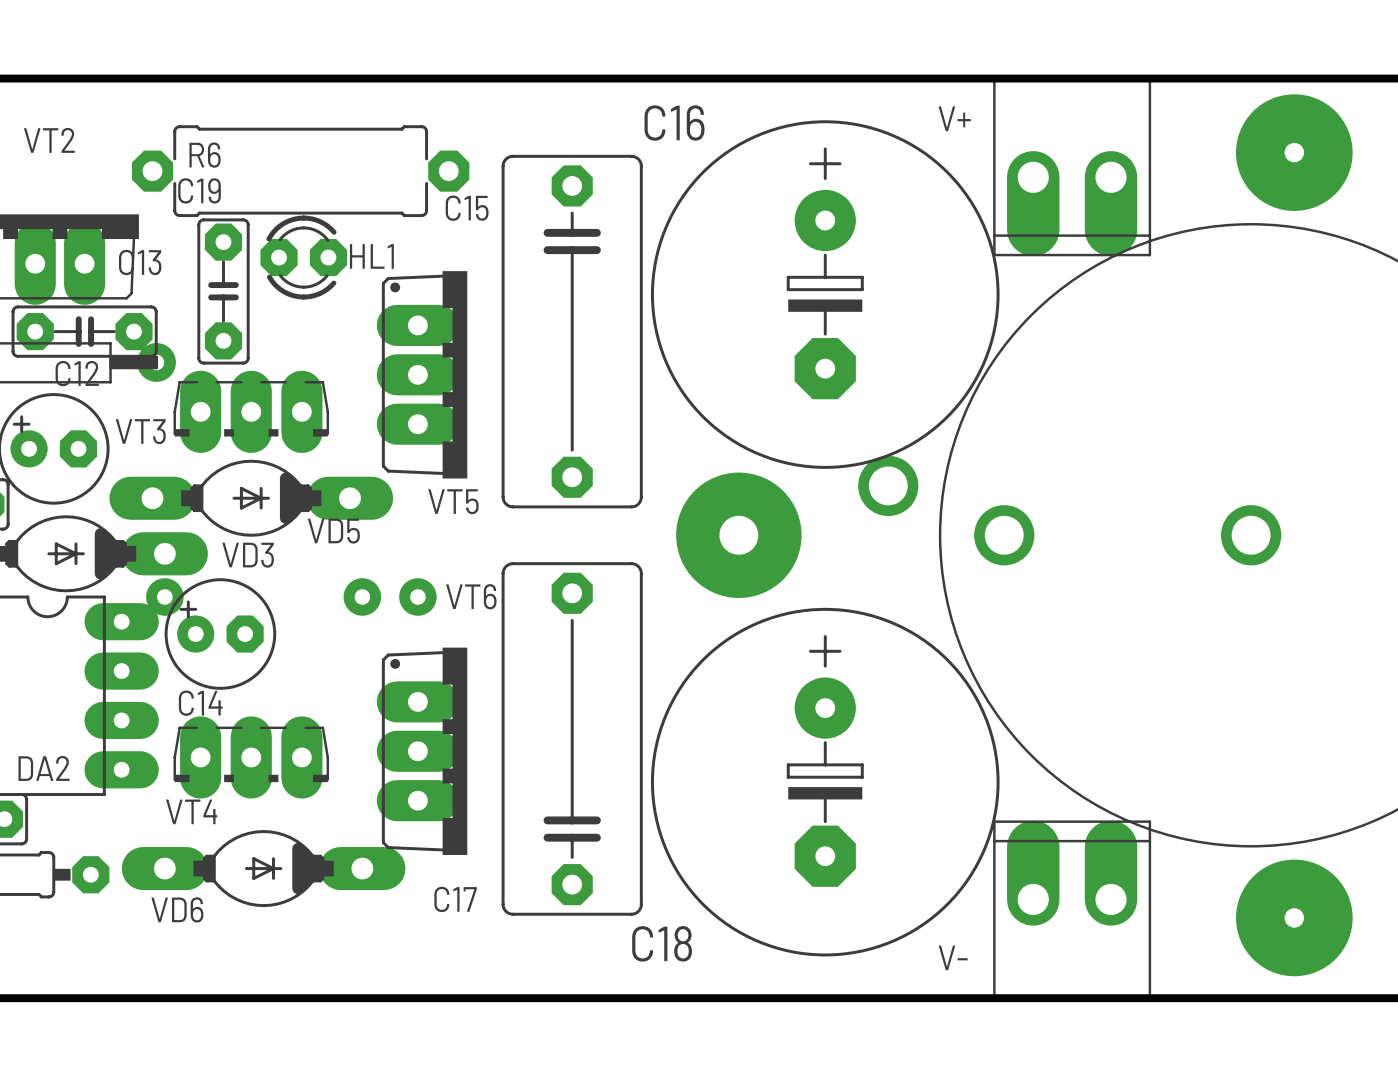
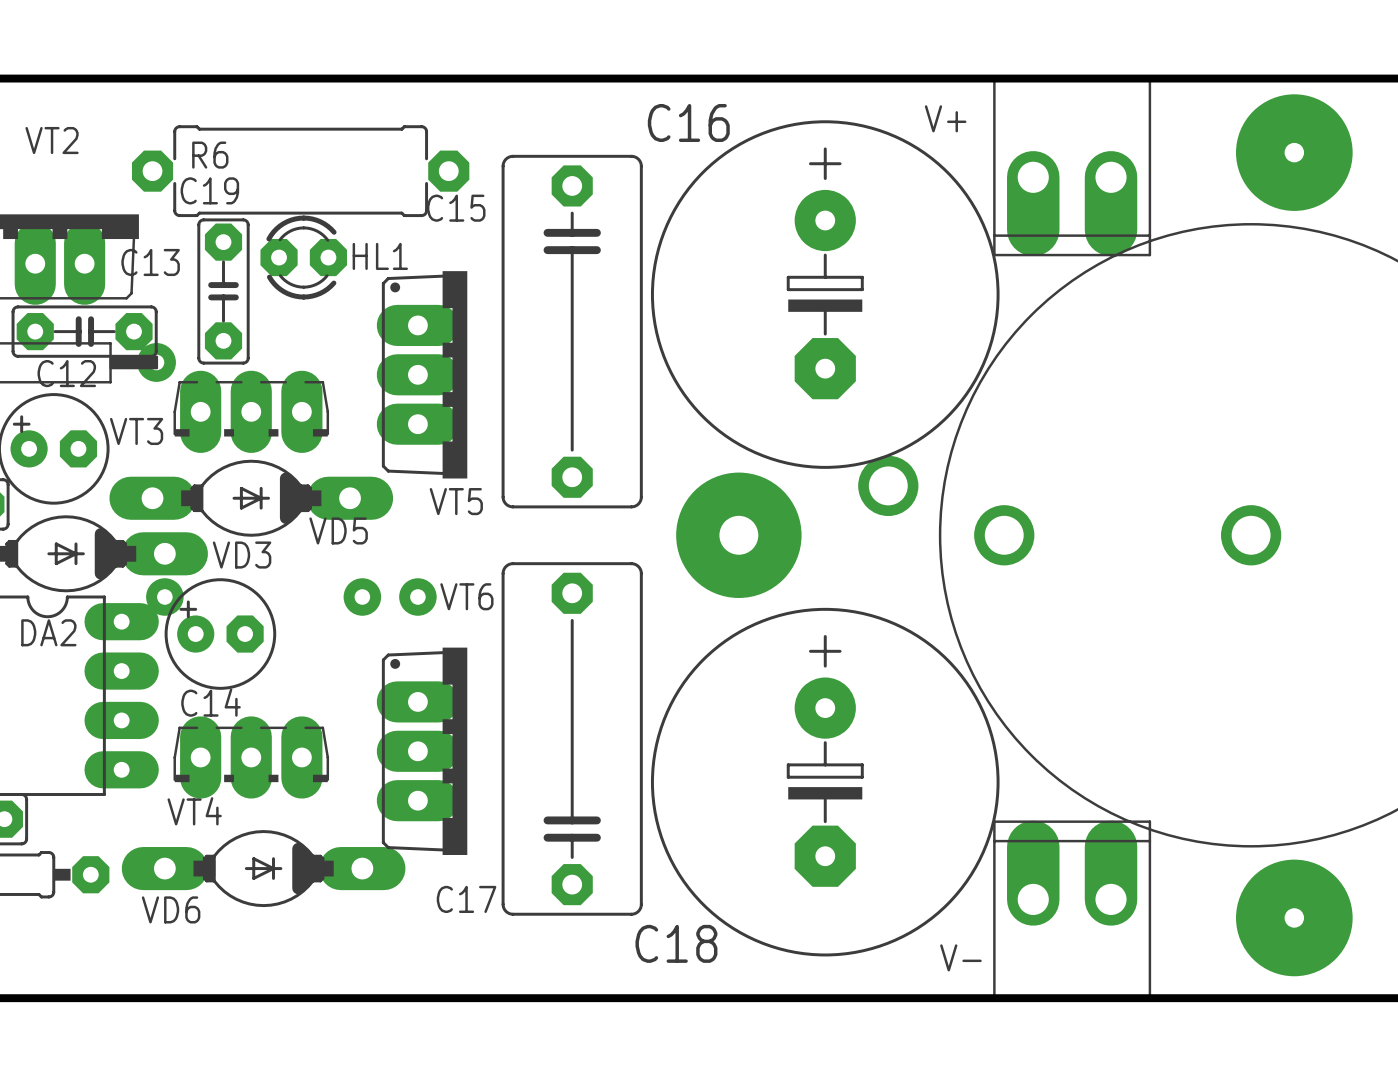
DA2 name position: DA2 (44, 768) -> DA2 (48, 632)

